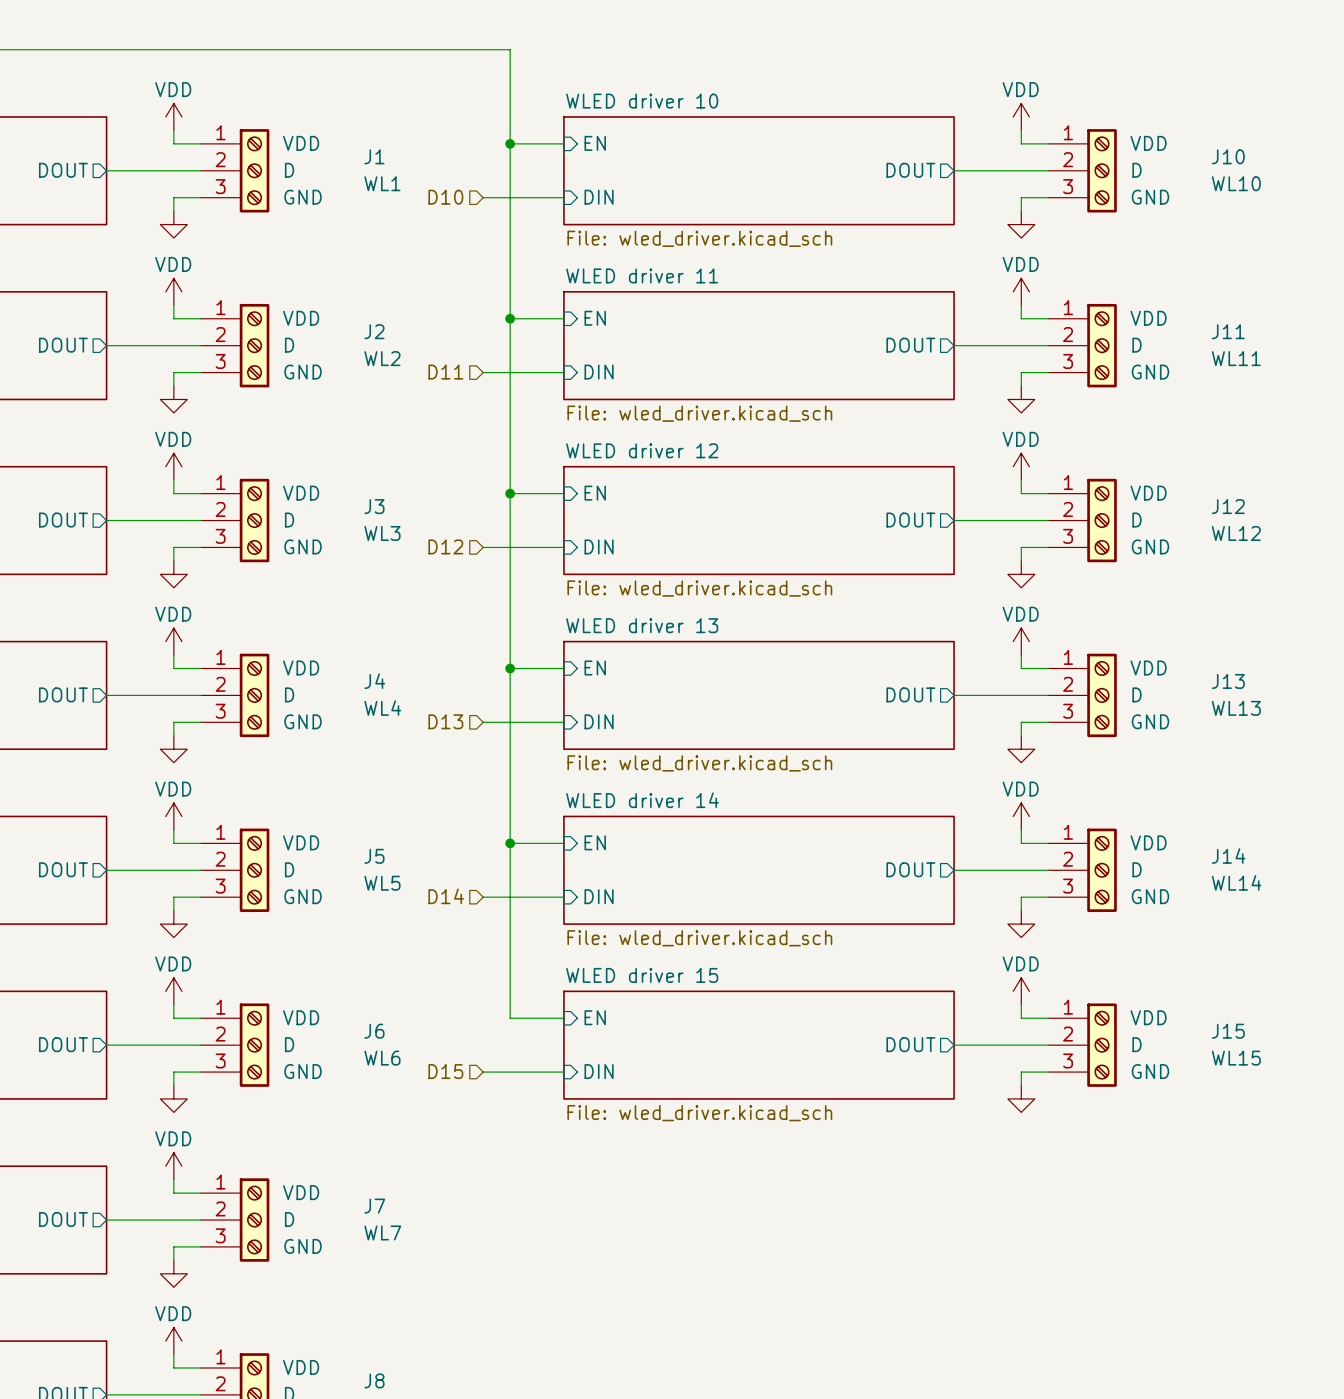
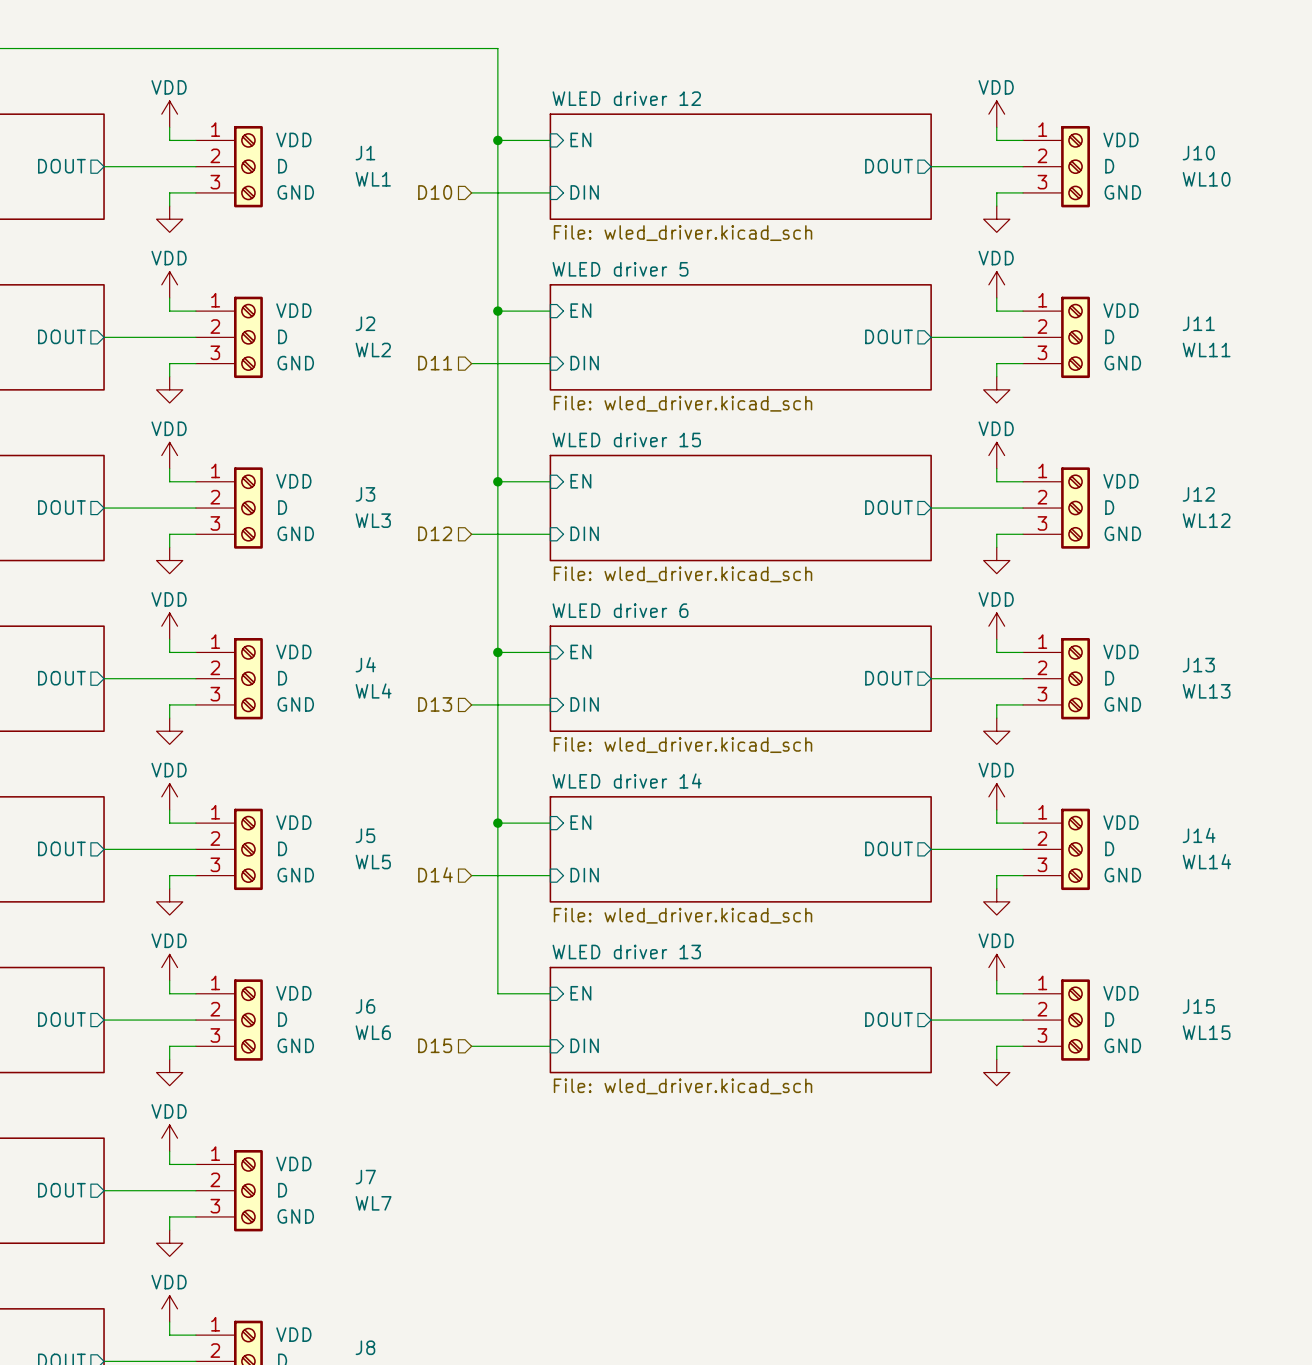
sheet WLED driver 10 name: WLED driver 10 (642, 101) -> WLED driver 12 (626, 98)
sheet WLED driver 11 name: WLED driver 11 (642, 275) -> WLED driver 5 (620, 269)
sheet WLED driver 12 name: WLED driver 12 (642, 450) -> WLED driver 15 (626, 439)
sheet WLED driver 13 name: WLED driver 13 (642, 625) -> WLED driver 6 (620, 610)
sheet WLED driver 15 name: WLED driver 15 (642, 975) -> WLED driver 13 (626, 951)

